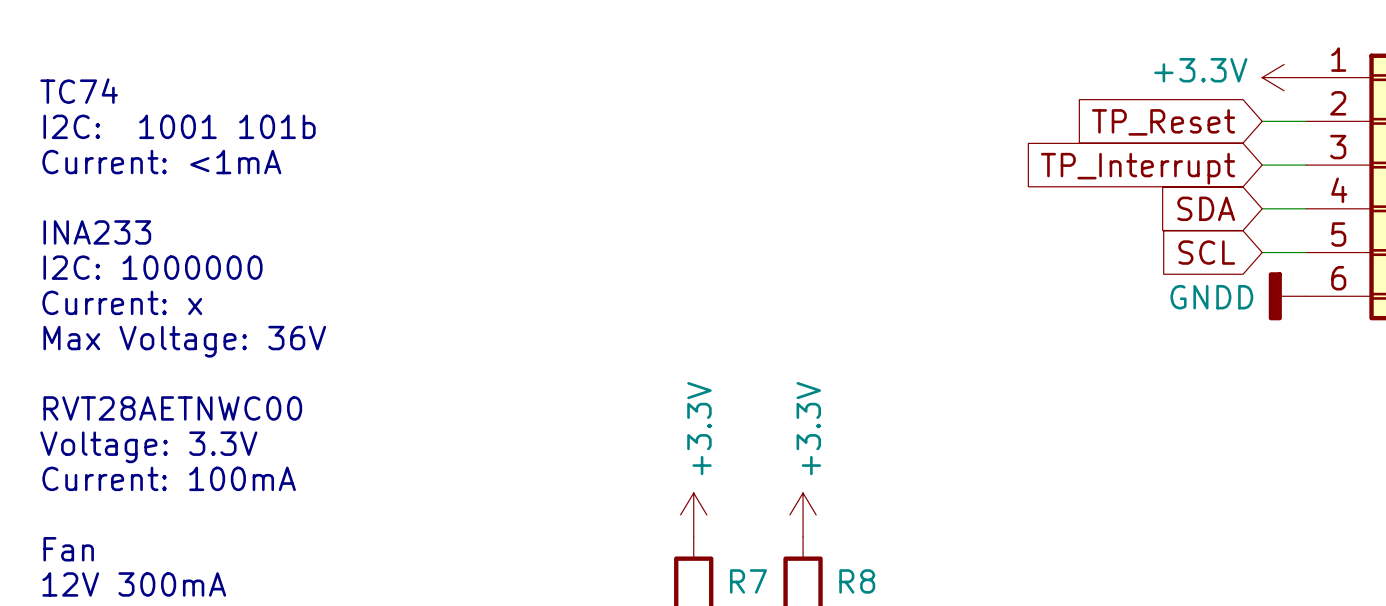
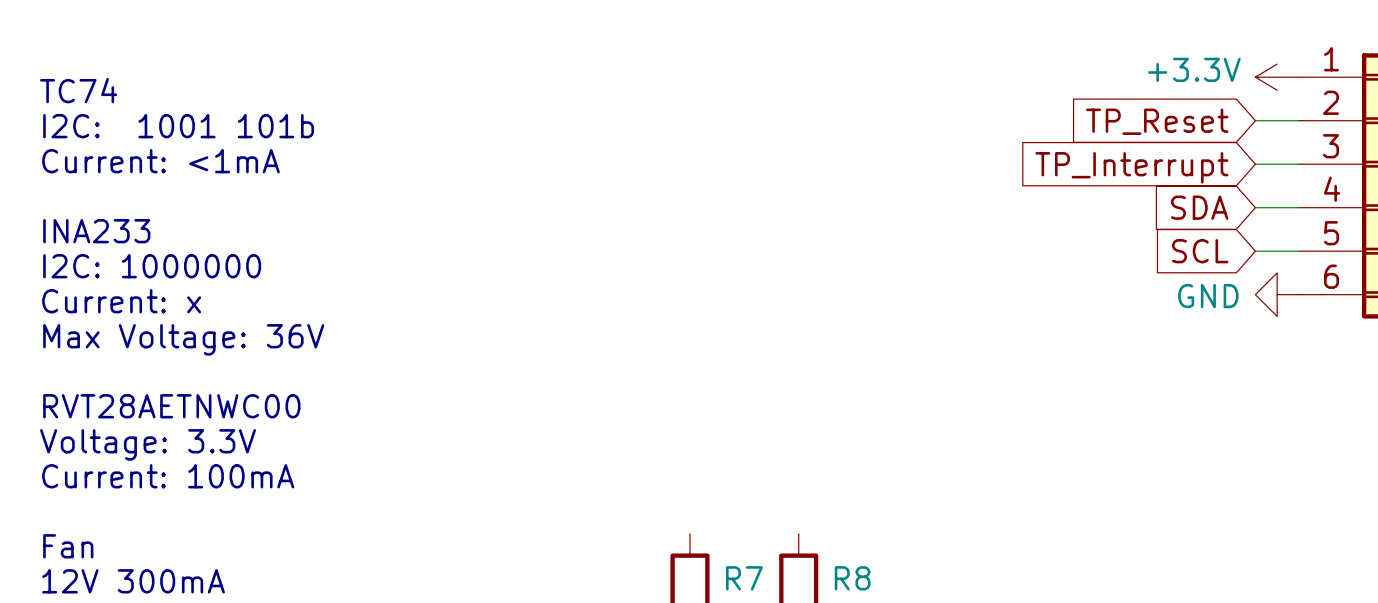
power symbol: GNDD (1287, 296) -> GND (1277, 294)
power symbol: +3.3V (693, 514) -> none
power symbol: +3.3V (803, 514) -> none

